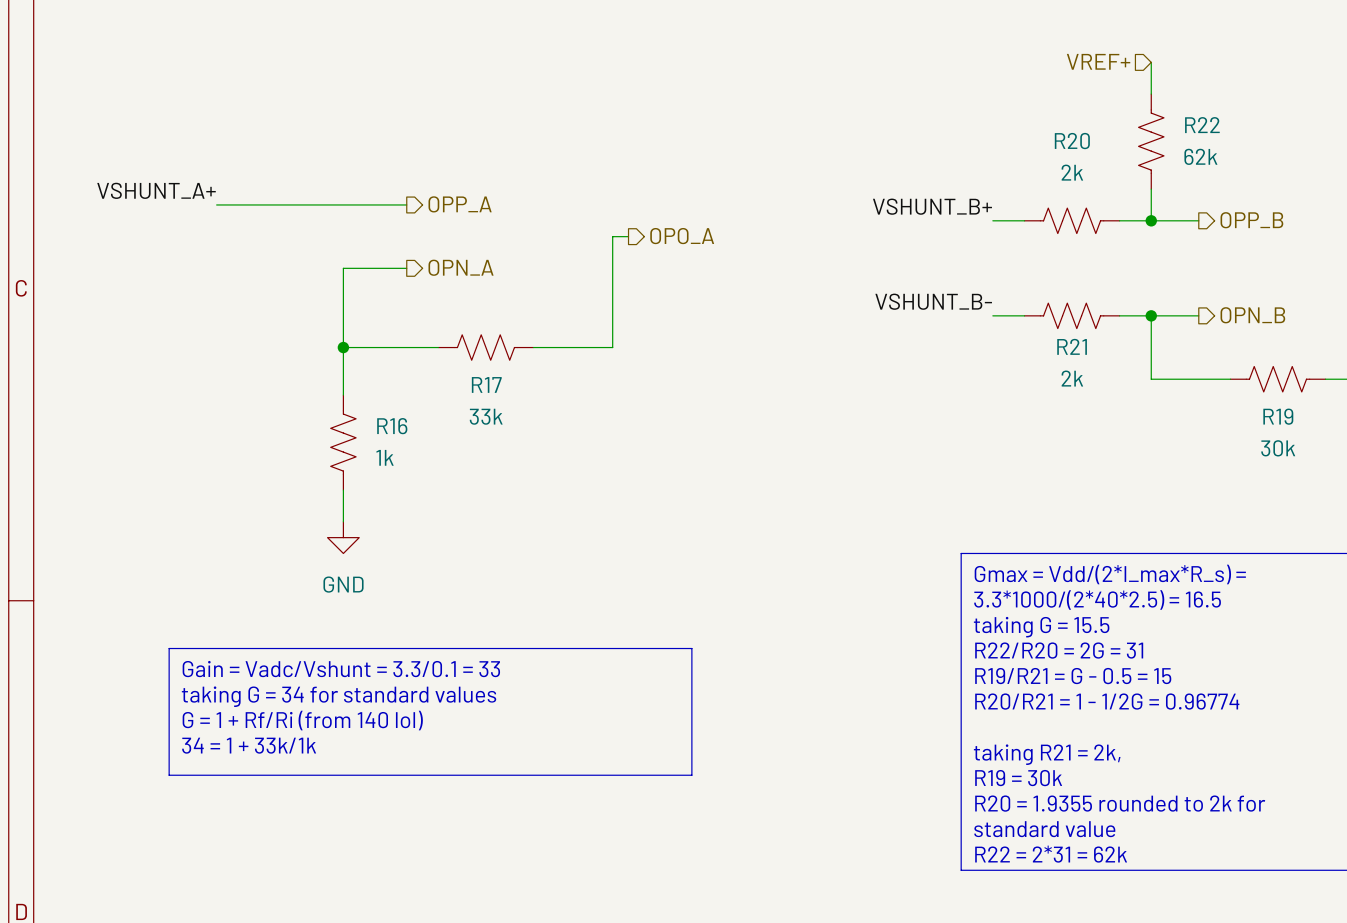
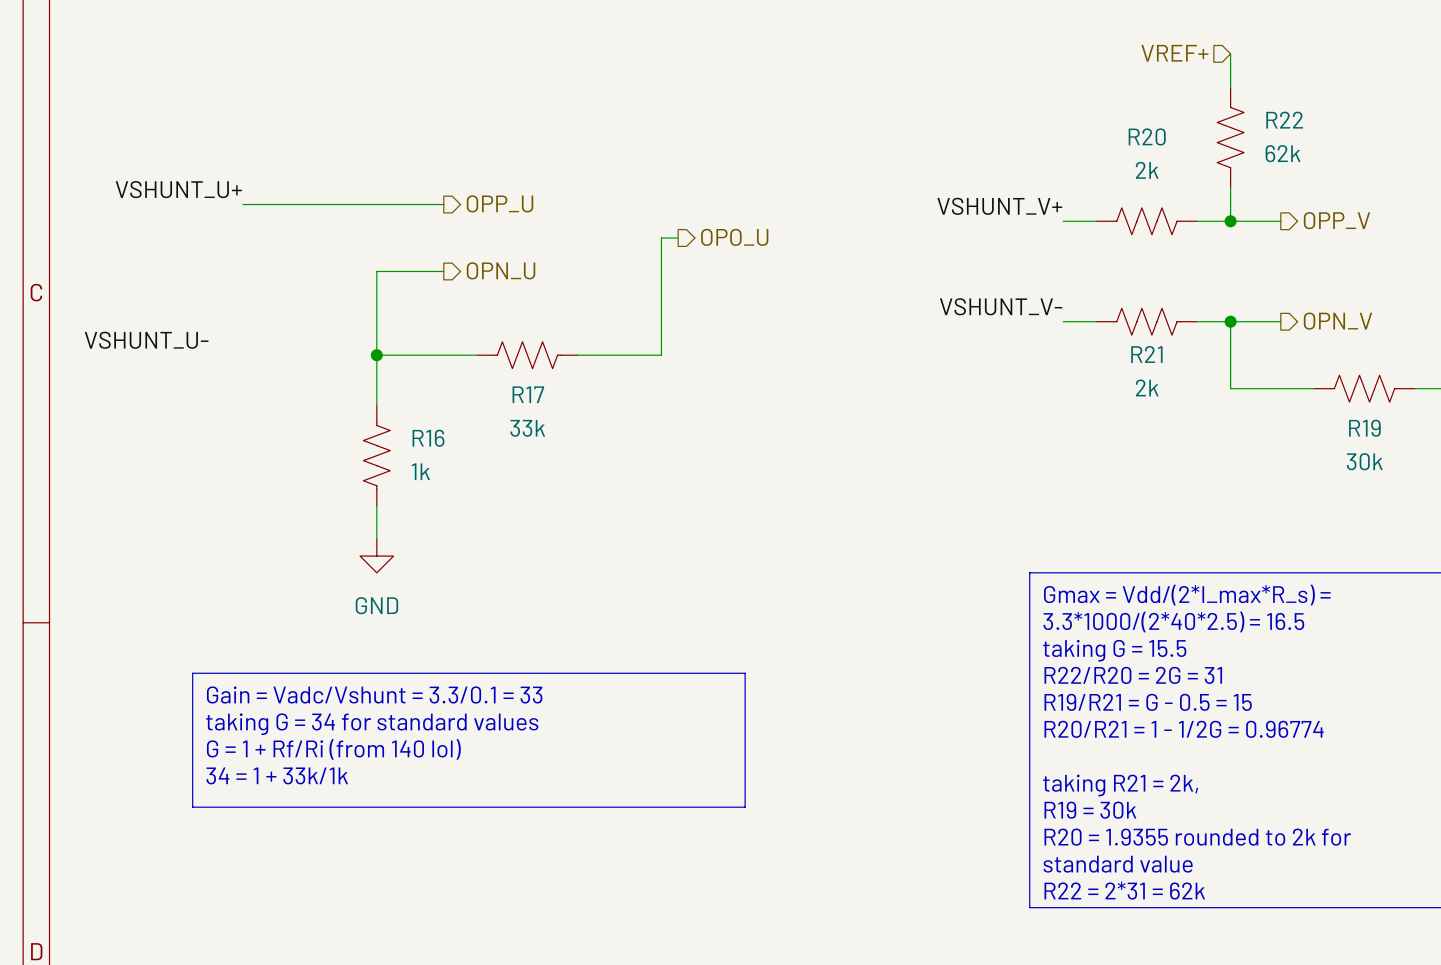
label: VSHUNT_A+ (156, 190) -> VSHUNT_U+ (178, 189)
hierarchical label: OPP_A (460, 204) -> OPP_U (500, 203)
label: VSHUNT_B+ (932, 206) -> VSHUNT_V+ (999, 206)
hierarchical label: OPP_B (1251, 220) -> OPP_V (1336, 220)
hierarchical label: OPO_A (682, 236) -> OPO_U (734, 237)
hierarchical label: OPN_A (461, 267) -> OPN_U (501, 270)
label: VSHUNT_B- (933, 301) -> VSHUNT_V- (1001, 306)
hierarchical label: OPN_B (1252, 315) -> OPN_V (1337, 321)
label: none -> VSHUNT_U- (146, 340)

